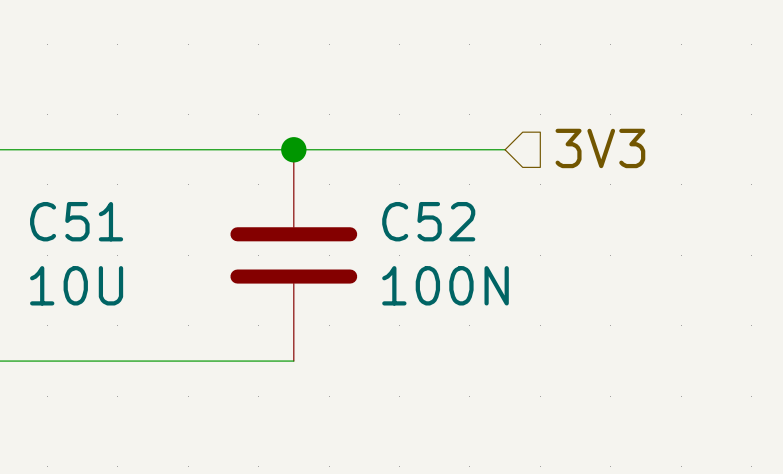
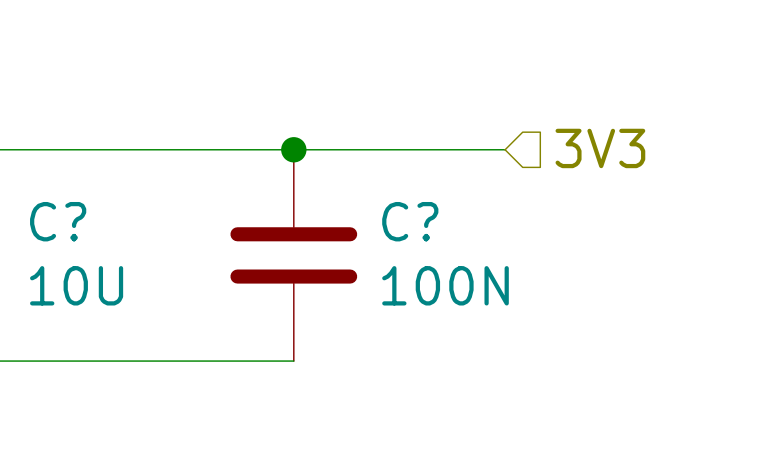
C51 name: C51 (76, 221) -> C? (58, 221)
C52 name: C52 (428, 221) -> C? (410, 221)

